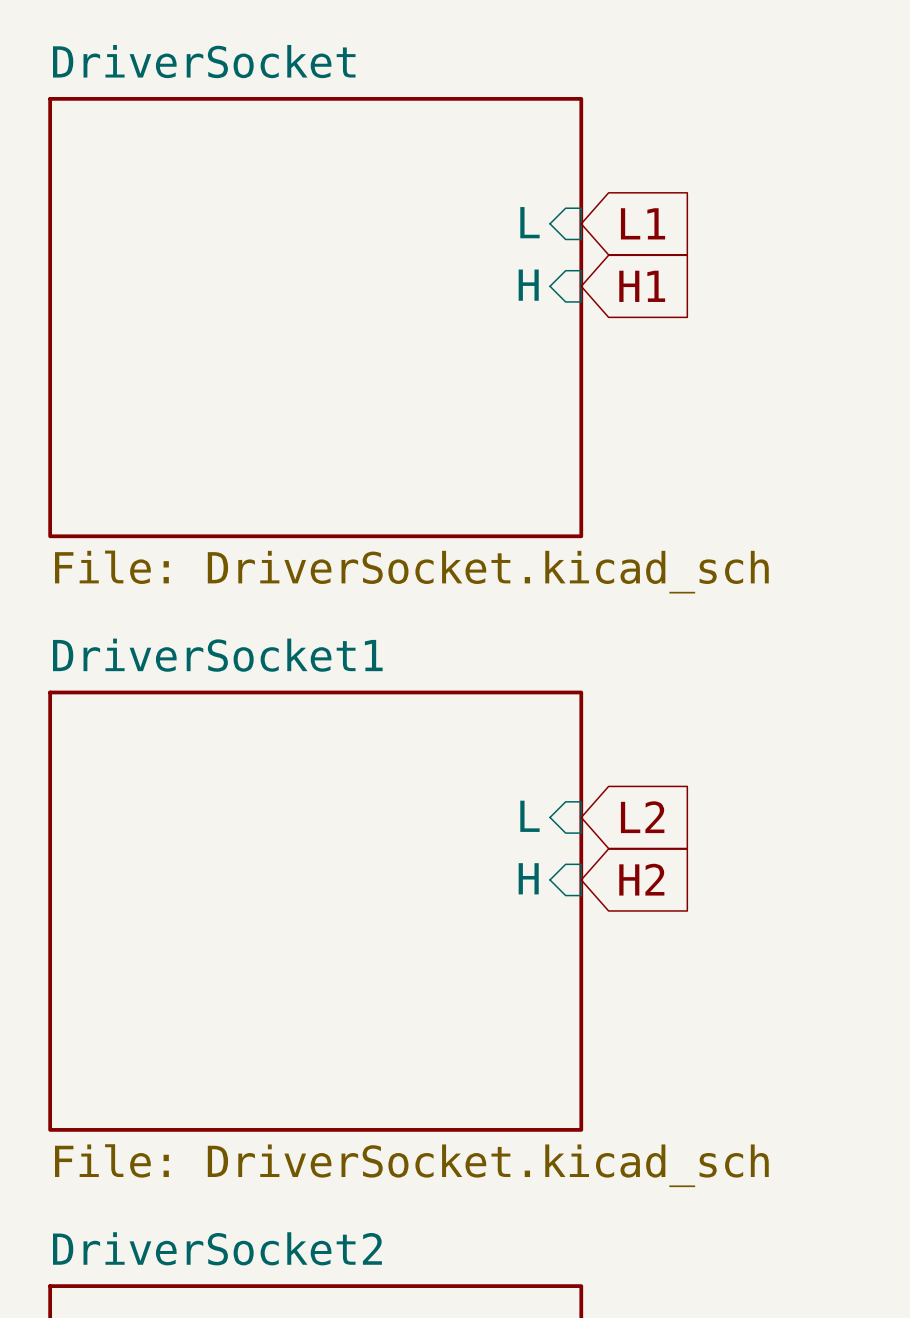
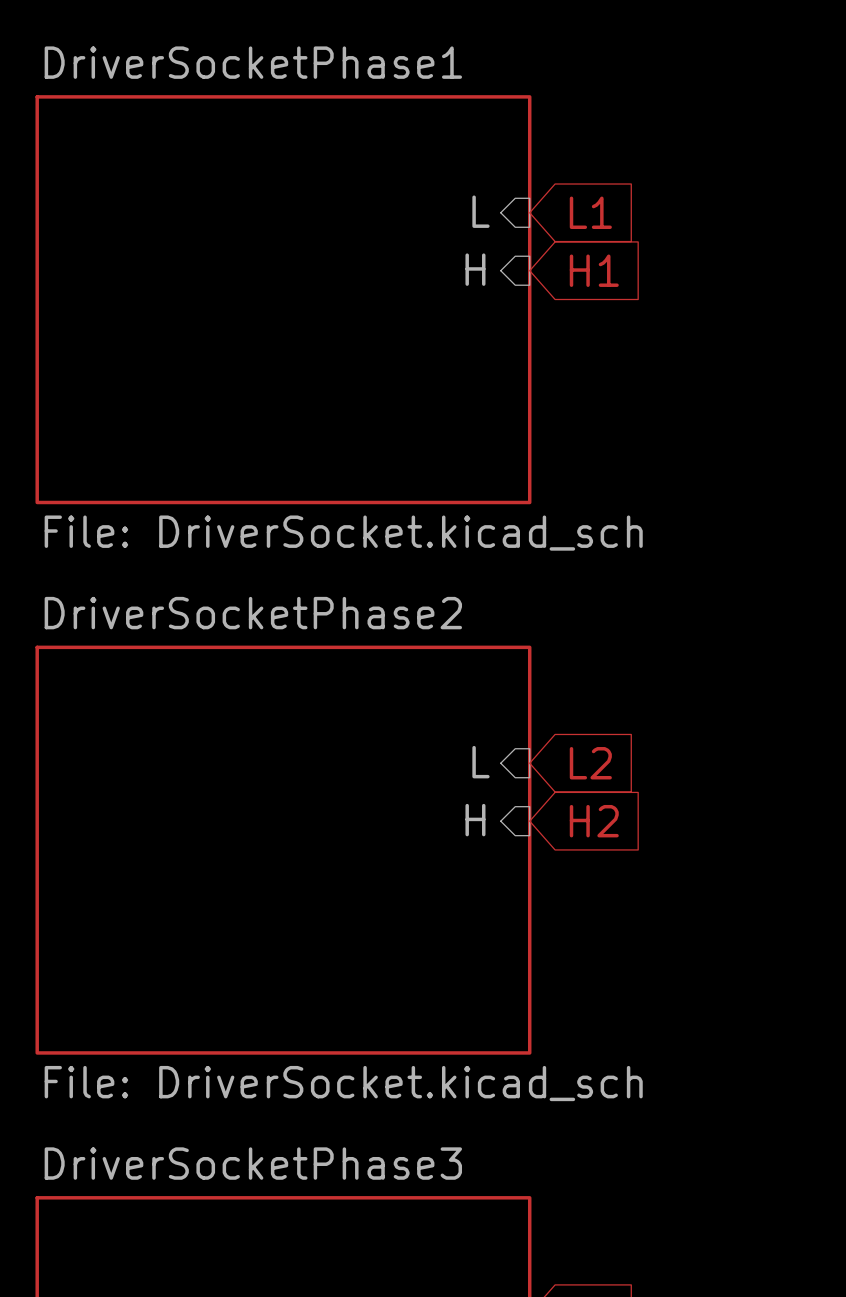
sheet DriverSocket name: DriverSocket (204, 61) -> DriverSocketPhase1 (253, 62)
sheet DriverSocket1 name: DriverSocket1 (217, 655) -> DriverSocketPhase2 (253, 613)
sheet DriverSocket2 name: DriverSocket2 (217, 1248) -> DriverSocketPhase3 (253, 1163)

